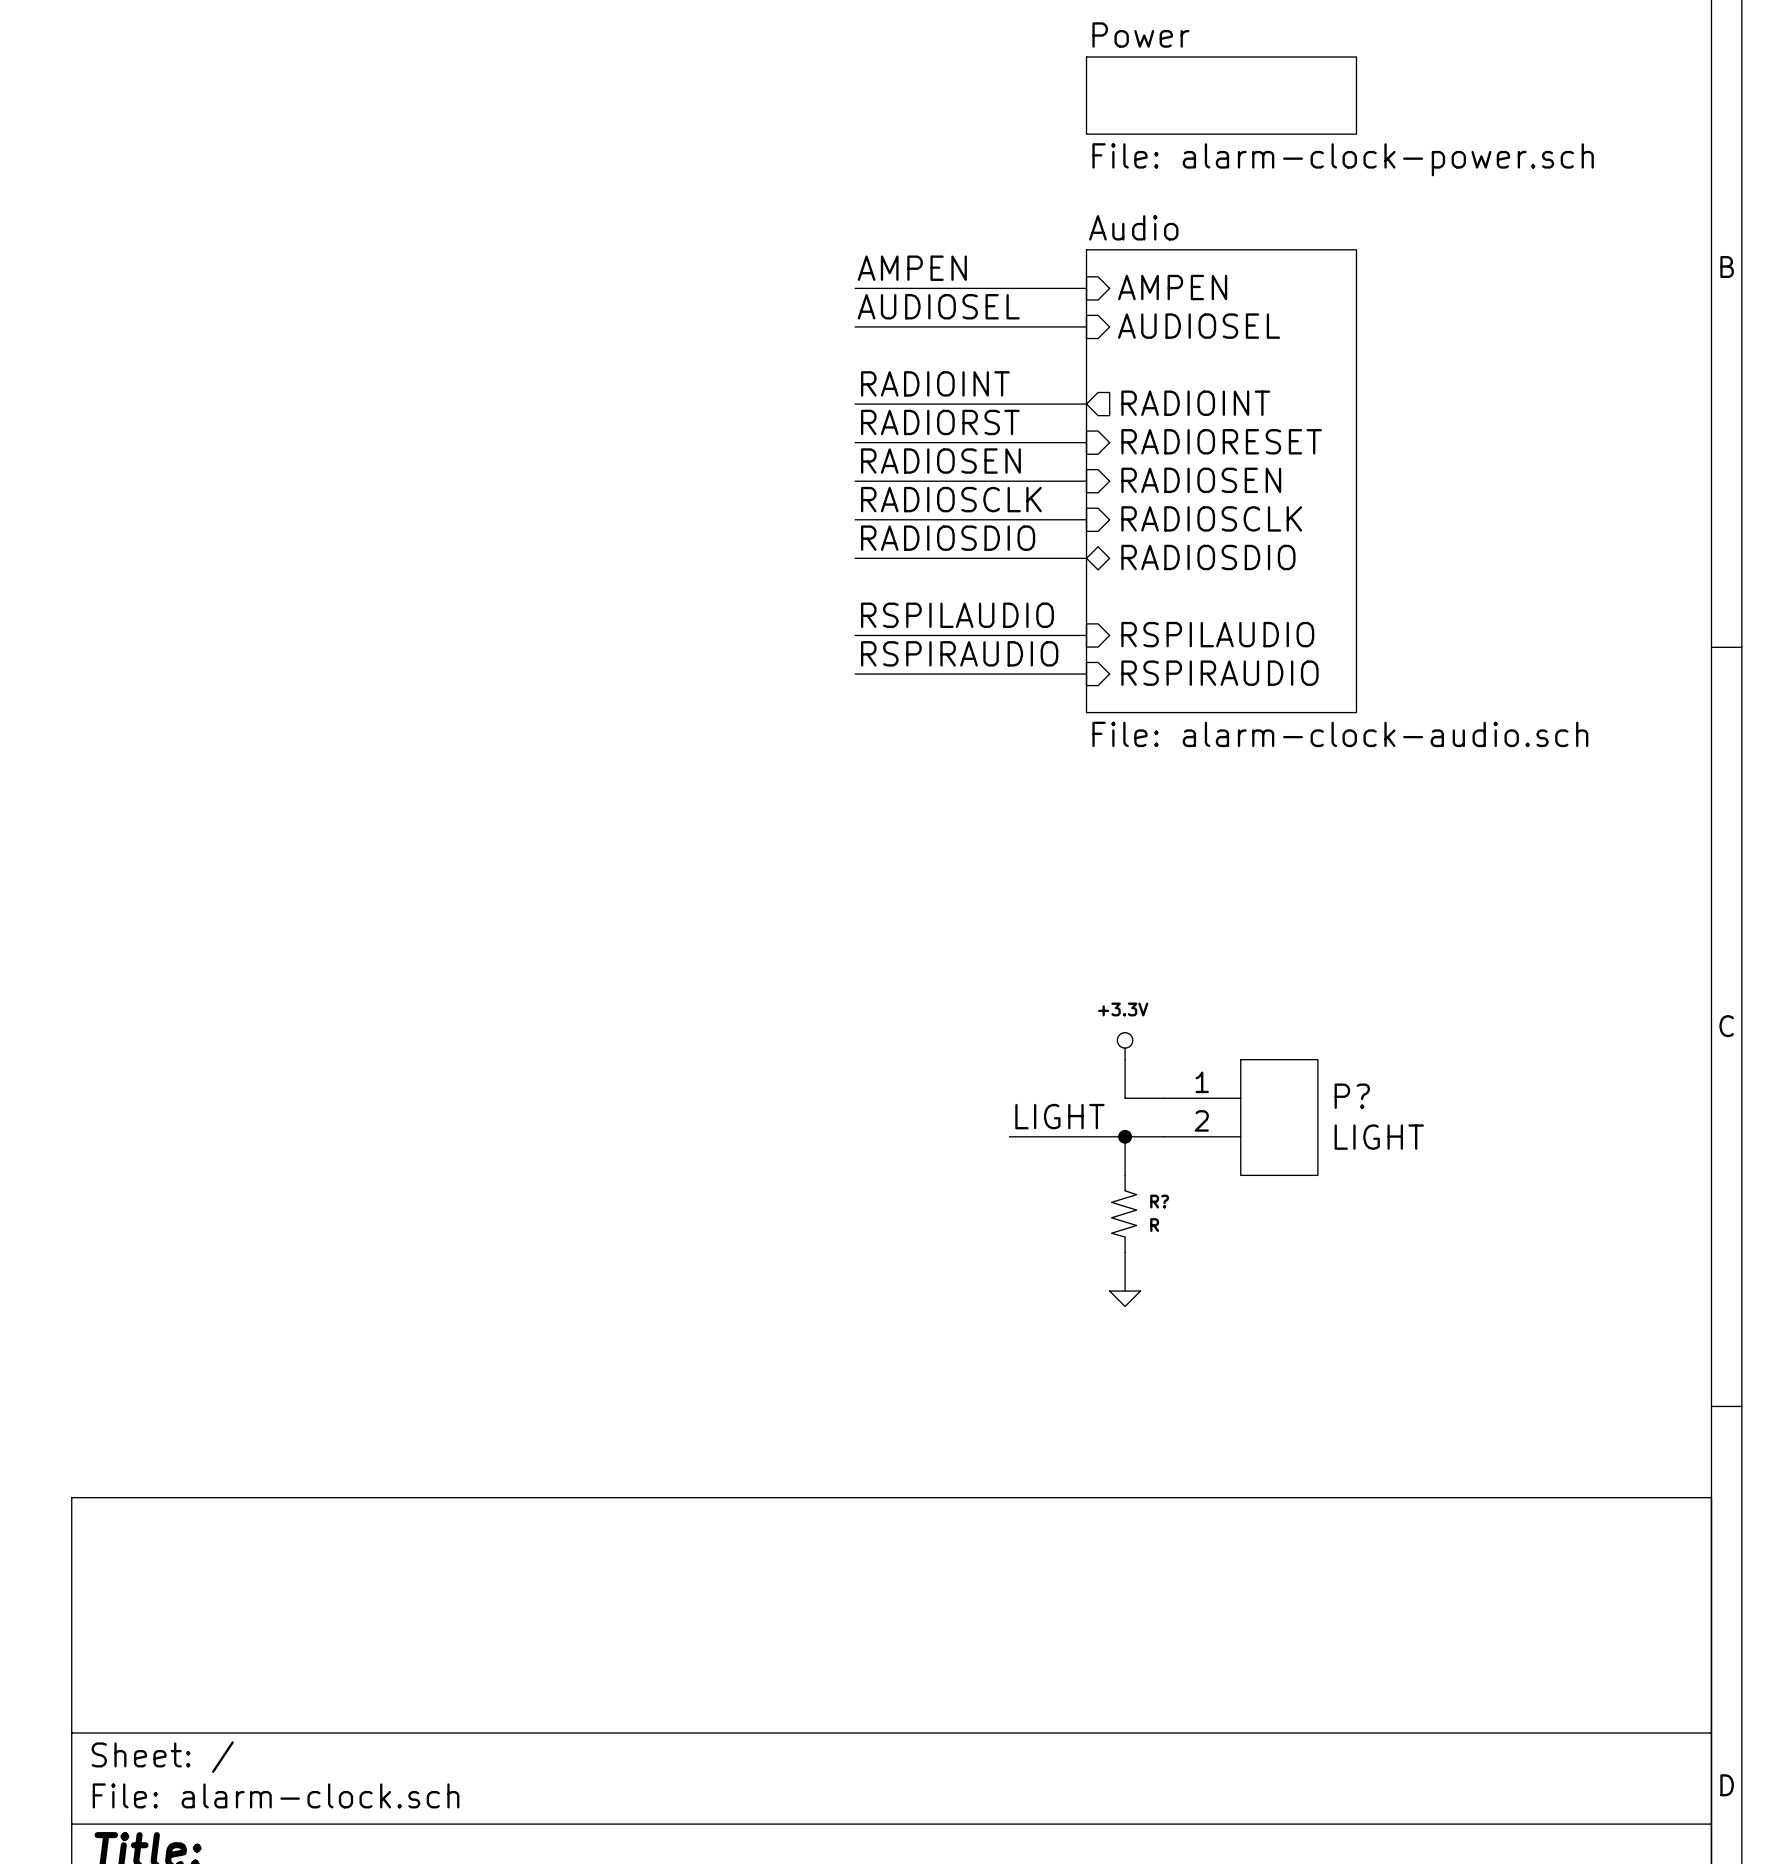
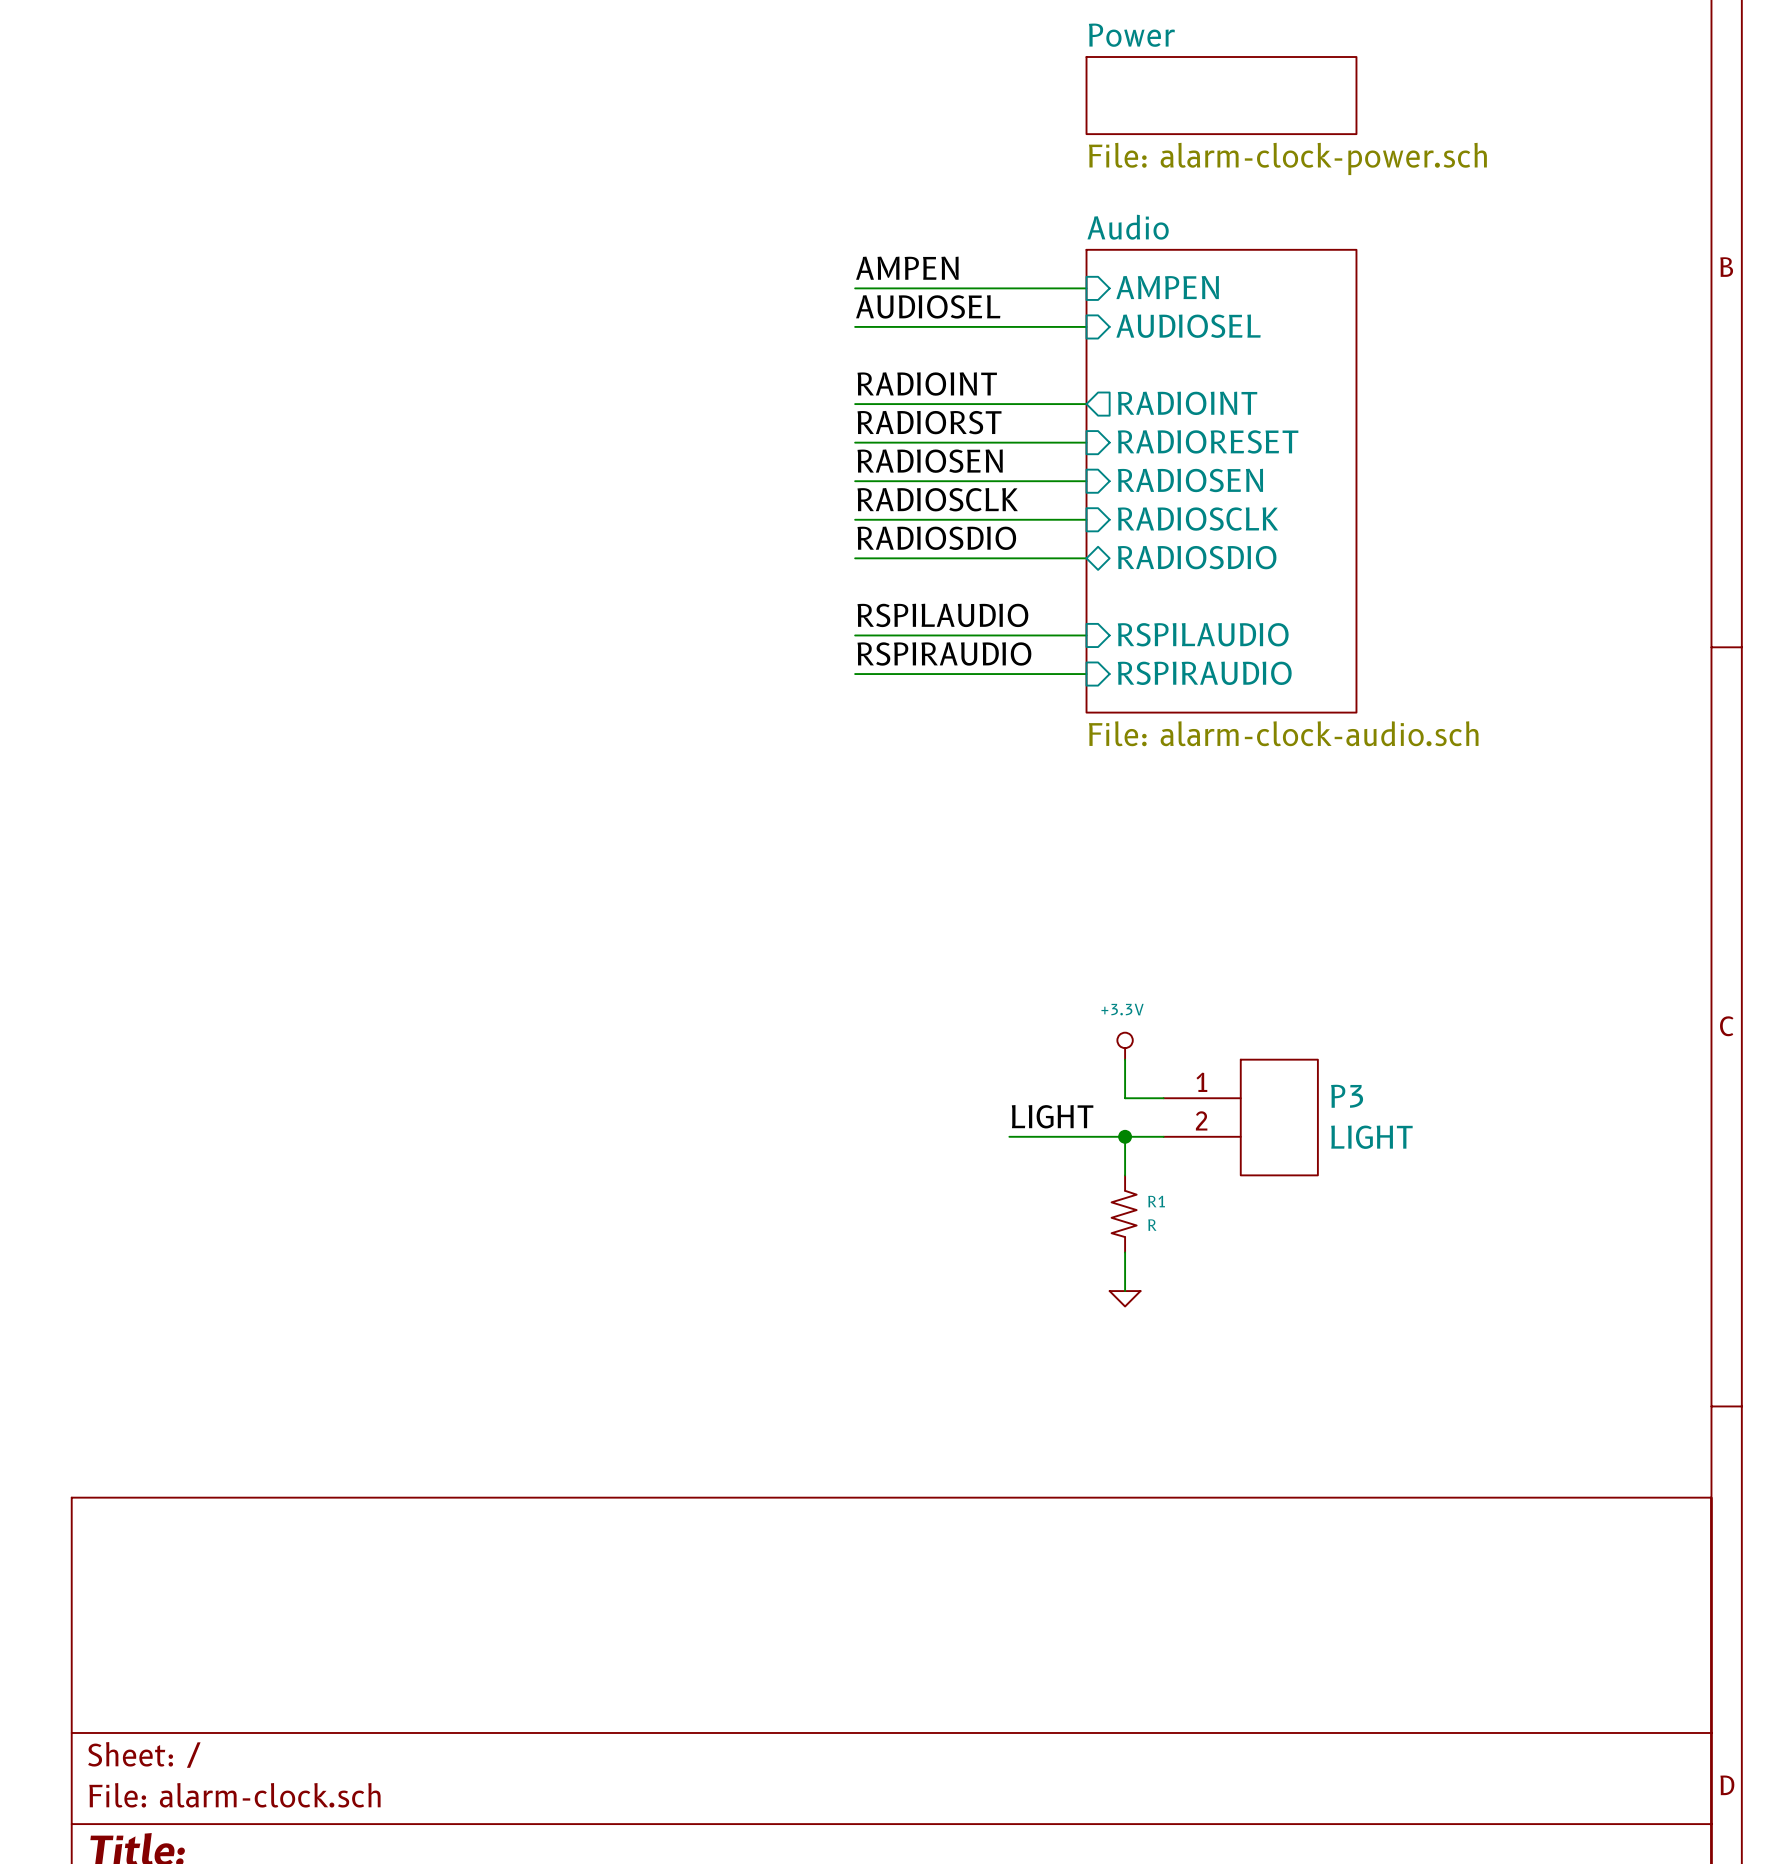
P? name: P? (1352, 1096) -> P3 (1347, 1096)
R? name: R? (1159, 1201) -> R1 (1156, 1201)

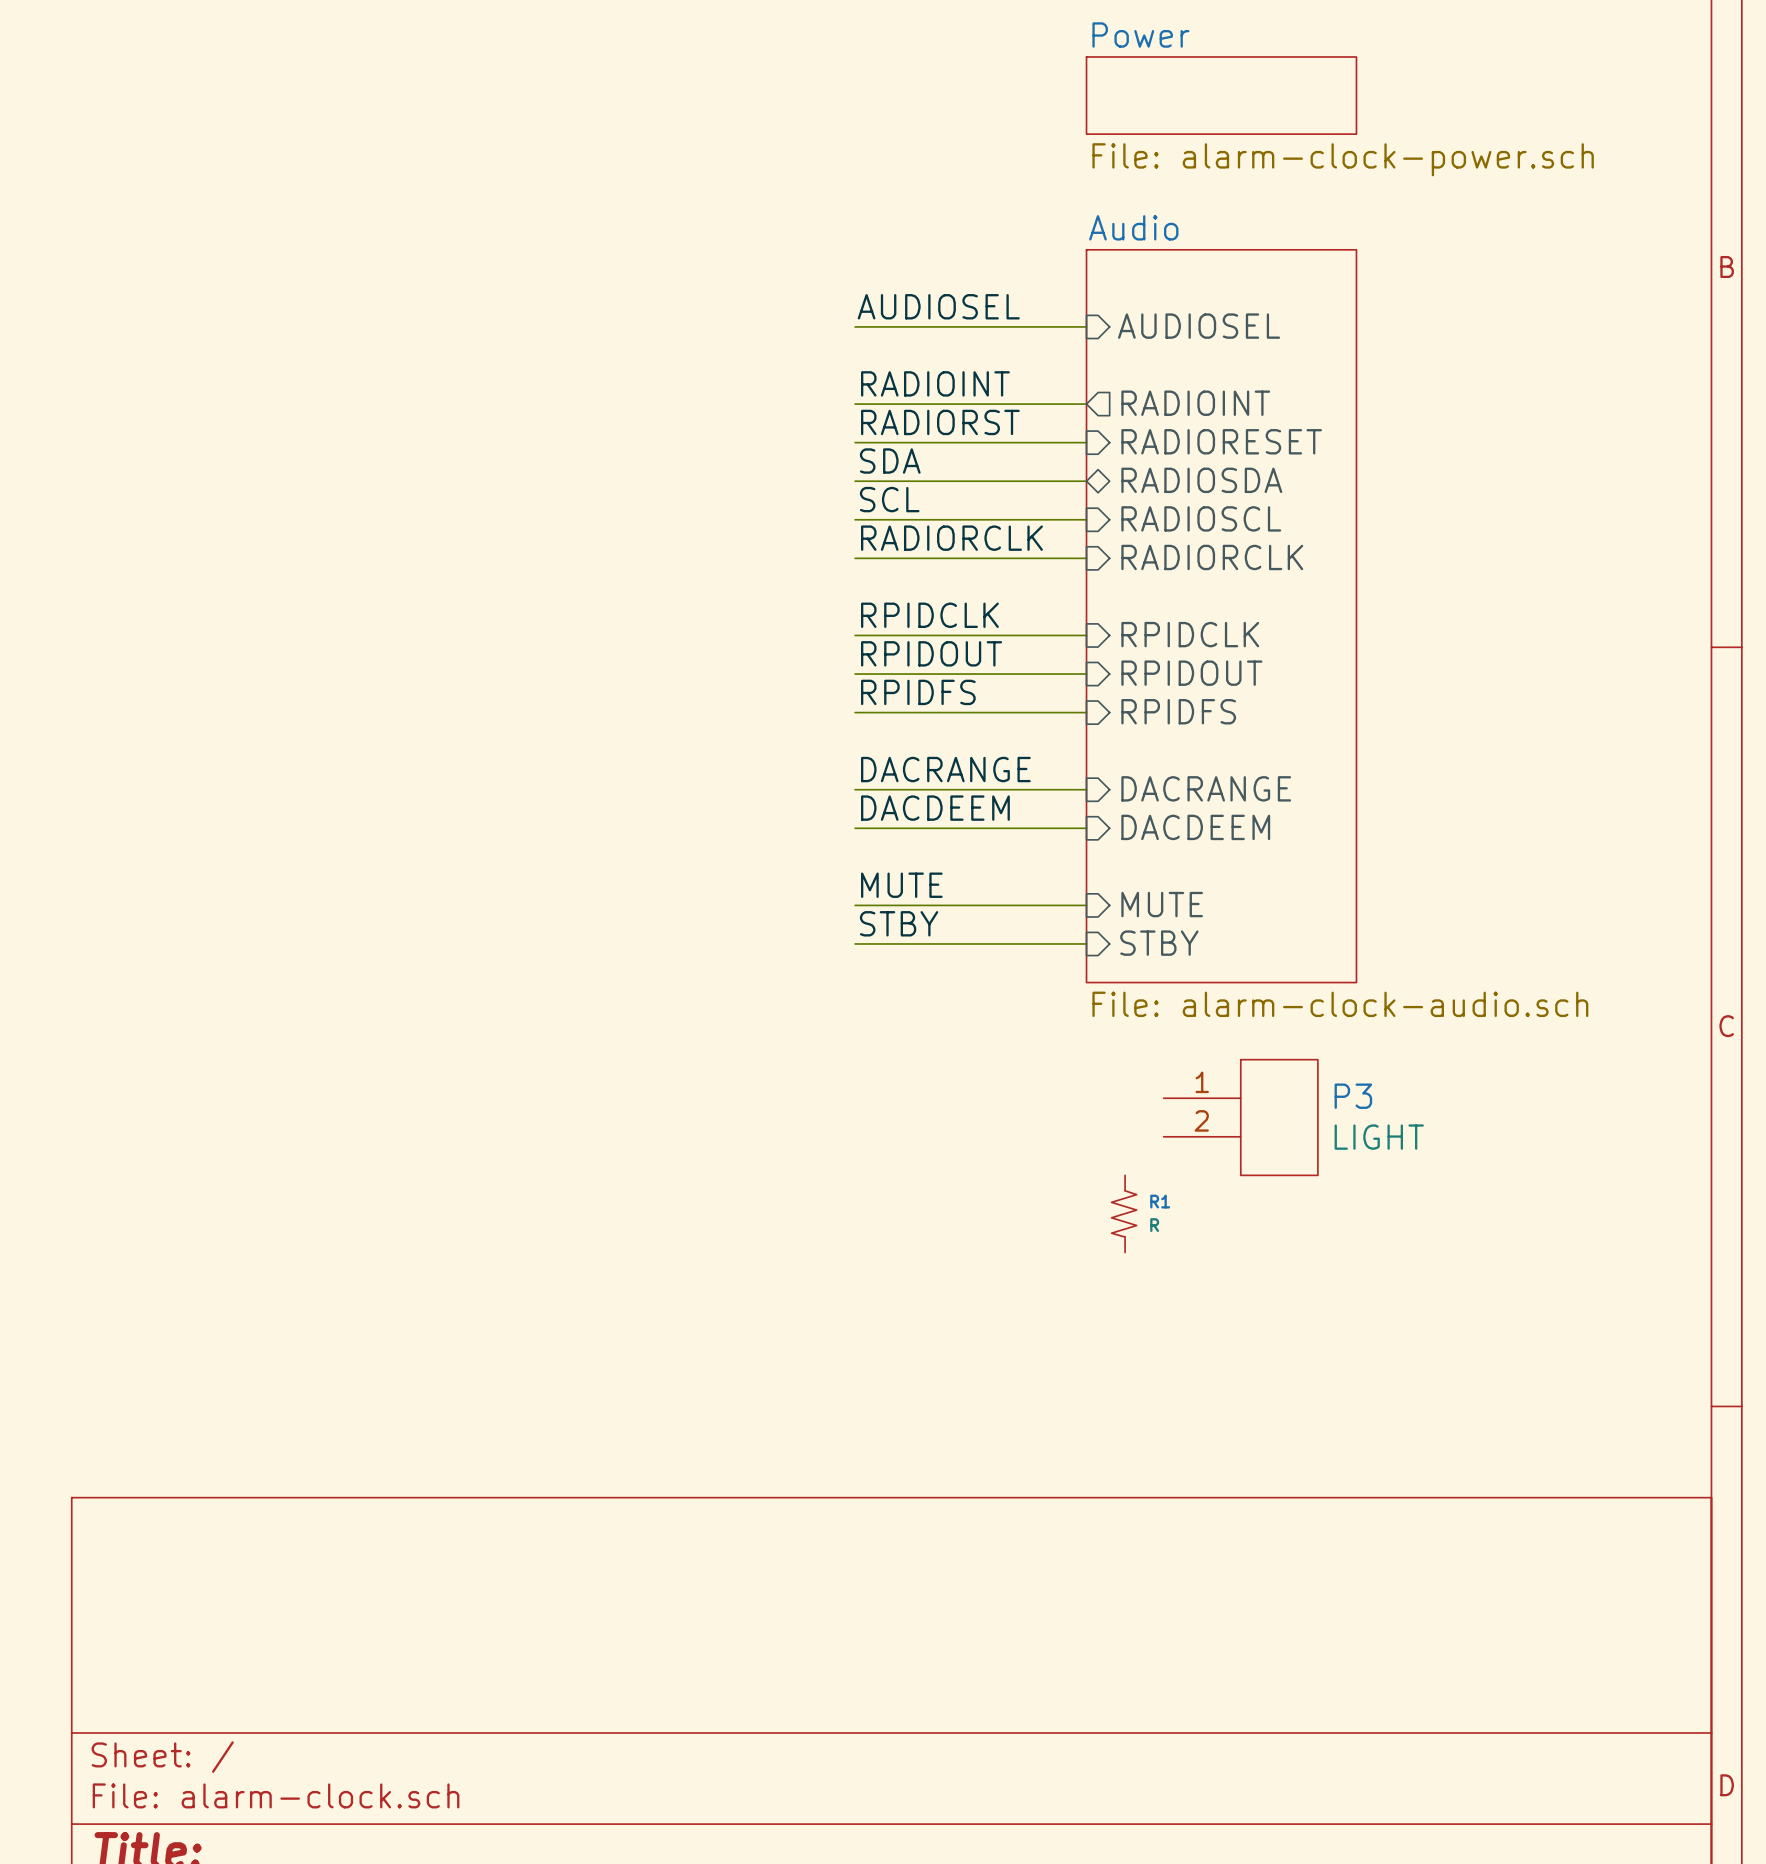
label: AMPEN (907, 268) -> none
sheet pin: AMPEN (1167, 287) -> none
wire: (855, 288) (1086, 288) -> none
label: RADIOSEN (930, 461) -> SDA (890, 461)
sheet pin shape: input (1190, 480) -> bidirectional (1201, 480)
sheet pin: RADIOSEN (1190, 480) -> RADIOSDA (1201, 480)
sheet Audio: File: alarm-clock-audio.sch (1221, 481) -> none
label: RADIOSCLK (937, 499) -> SCL (889, 499)
sheet pin: RADIOSCLK (1197, 519) -> RADIOSCL (1201, 518)
label: RADIOSDIO (936, 538) -> RADIORCLK (951, 538)
sheet pin shape: bidirectional (1197, 557) -> input (1212, 557)
sheet pin: RADIOSDIO (1197, 557) -> RADIORCLK (1212, 557)
label: RSPILAUDIO (942, 615) -> RPIDCLK (929, 615)
sheet Audio: none -> File: alarm-clock-audio.sch (1221, 616)
sheet pin: RSPILAUDIO (1203, 634) -> RPIDCLK (1190, 634)
label: RSPIRAUDIO (944, 653) -> RPIDOUT (931, 653)
sheet pin: RSPIRAUDIO (1204, 673) -> RPIDOUT (1191, 673)
label: none -> RPIDFS (918, 692)
sheet pin: none -> RPIDFS (1178, 711)
wire: none -> (855, 712) (1086, 712)
label: none -> DACRANGE (945, 769)
sheet pin: none -> DACRANGE (1206, 788)
wire: none -> (855, 789) (1086, 789)
label: none -> DACDEEM (935, 808)
sheet pin: none -> DACDEEM (1195, 827)
wire: none -> (855, 828) (1086, 828)
label: none -> MUTE (901, 885)
sheet pin: none -> MUTE (1162, 904)
wire: none -> (855, 905) (1086, 905)
label: none -> STBY (899, 923)
wire: none -> (855, 943) (1086, 943)
sheet pin: none -> STBY (1159, 943)
power symbol: +3.3V (1125, 1046) -> none
wire: (1125, 1059) (1125, 1098) (1163, 1098) -> none
label: LIGHT (1052, 1116) -> none
wire: (1009, 1136) (1163, 1136) -> none
wire: (1125, 1136) (1125, 1175) -> none
junction: (1125, 1136) -> none
wire: (1125, 1252) (1125, 1291) -> none
power symbol: (1125, 1298) -> none

